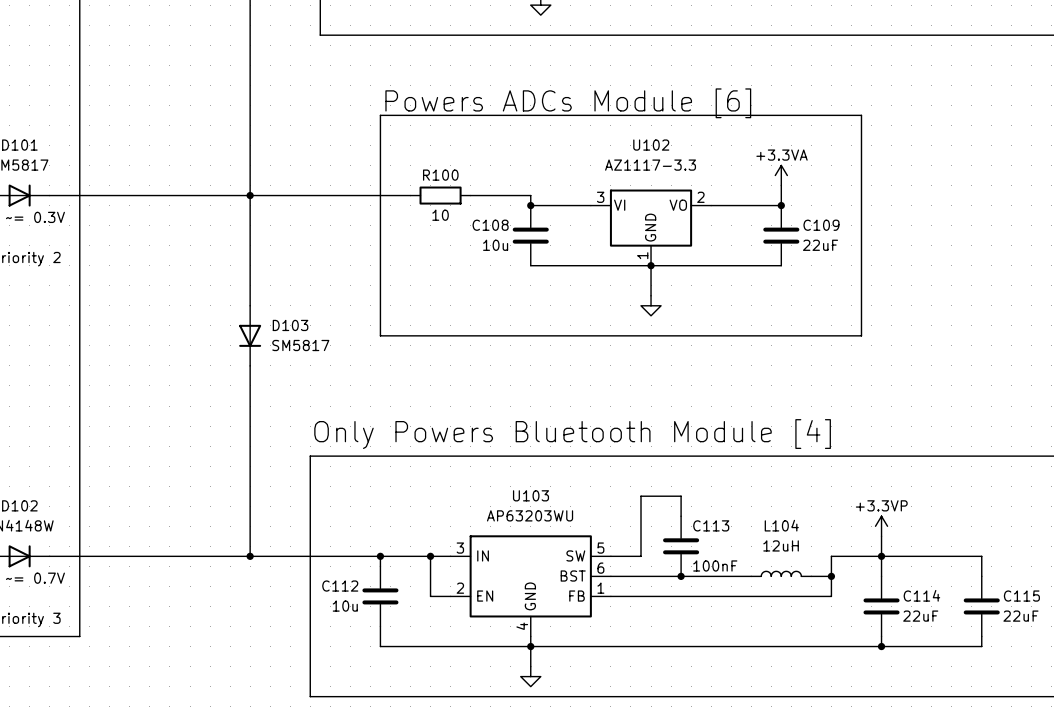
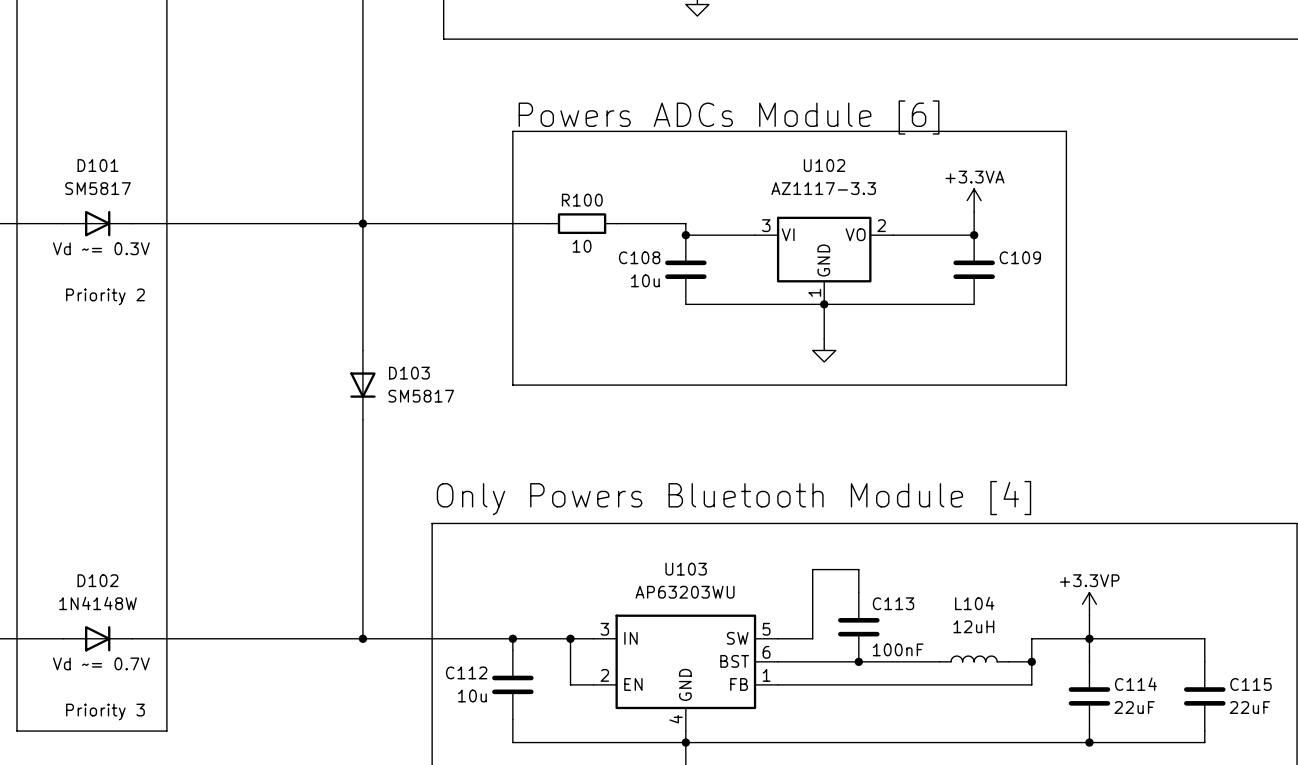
C109 value: 22uF (820, 245) -> none

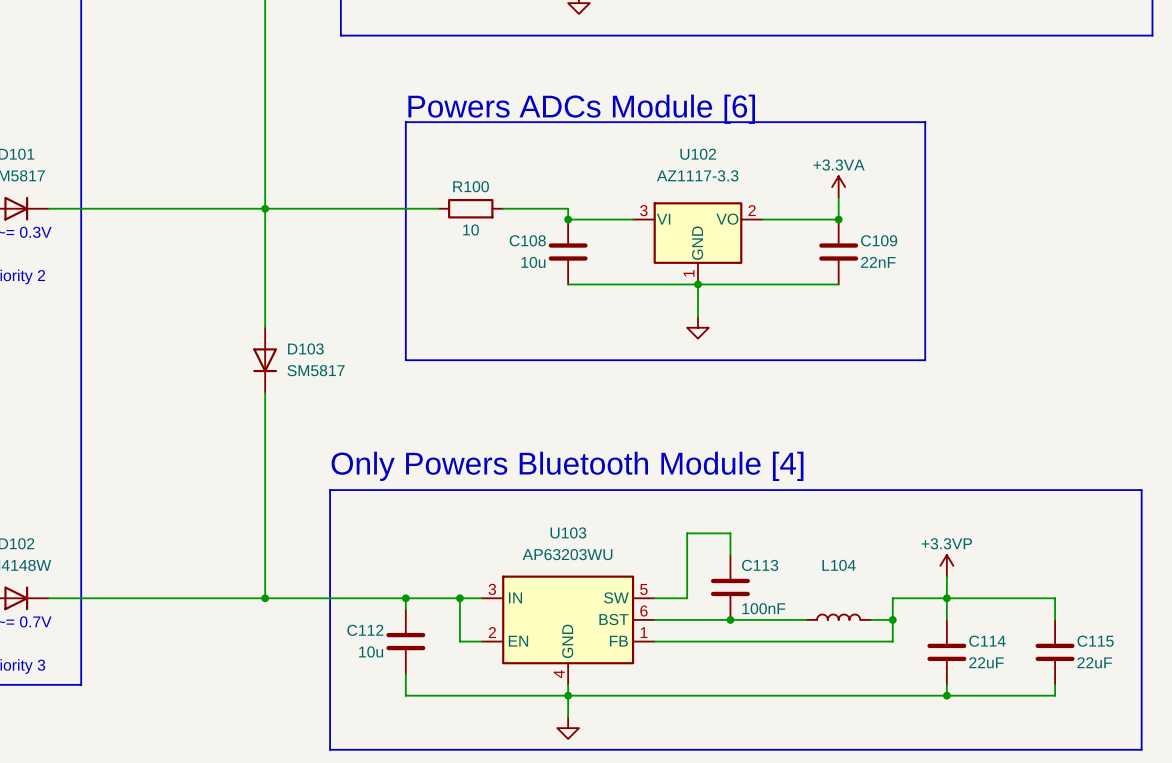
C109 value: none -> 22nF (878, 262)
L104 value: 12uH (973, 626) -> none

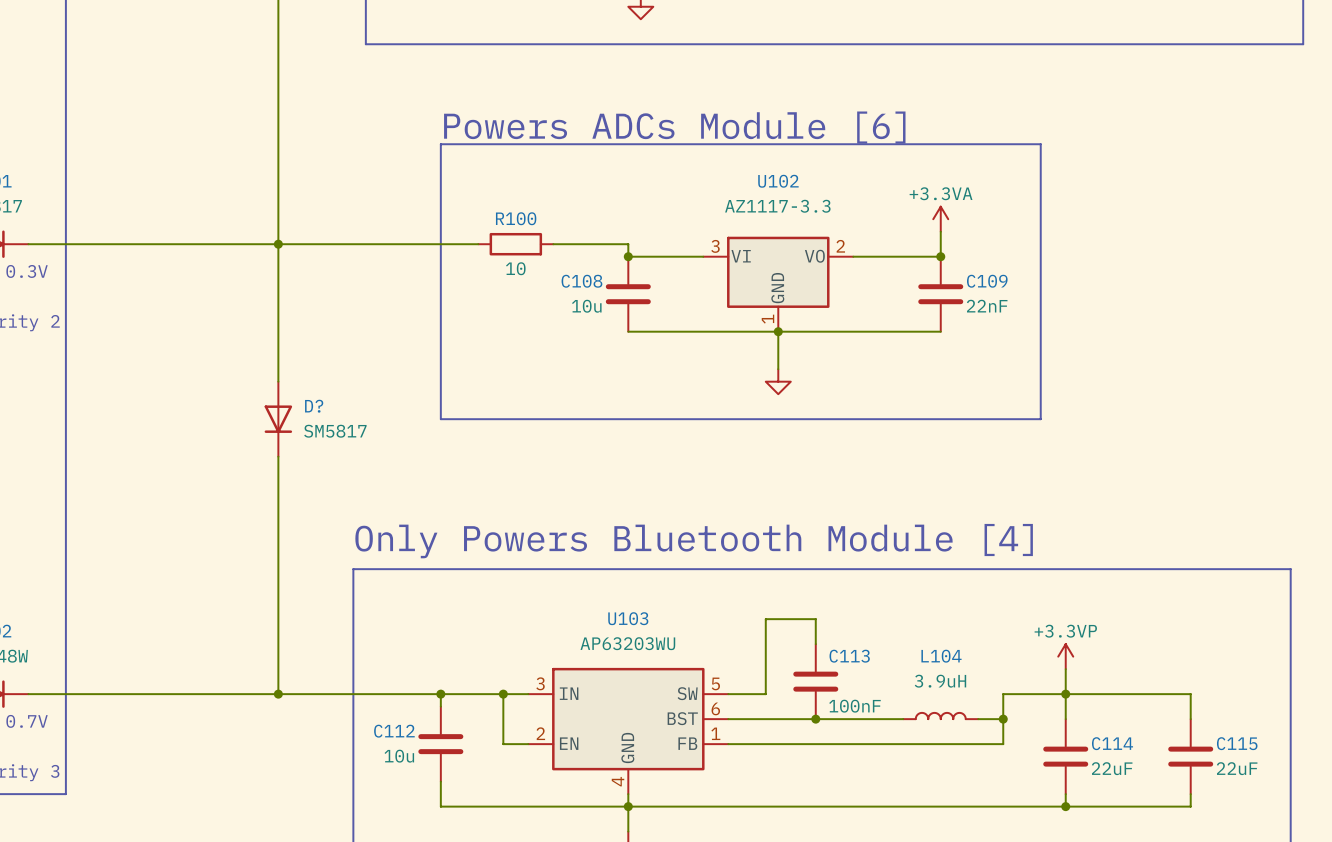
D103 name: D103 (305, 348) -> D? (314, 406)
L104 value: none -> 3.9uH (940, 681)

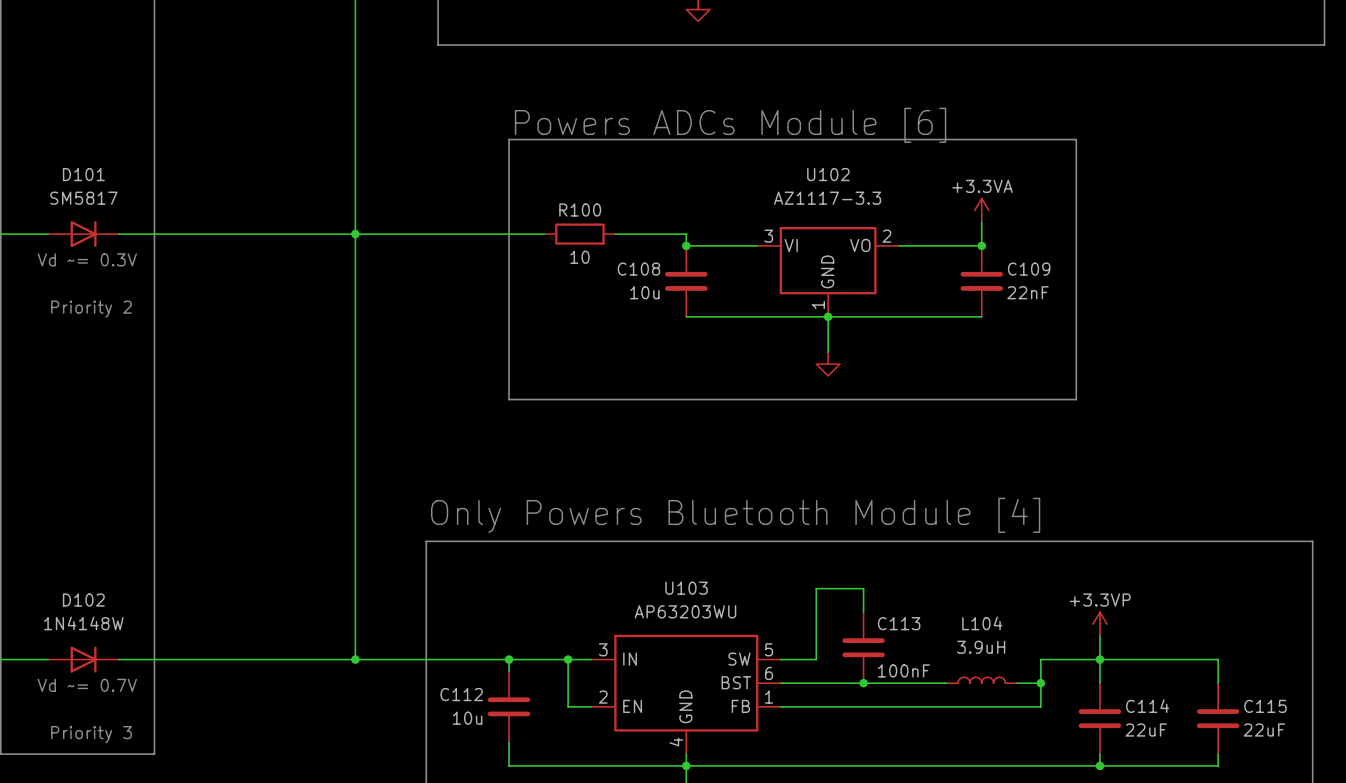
D?: SM5817 (278, 419) -> none

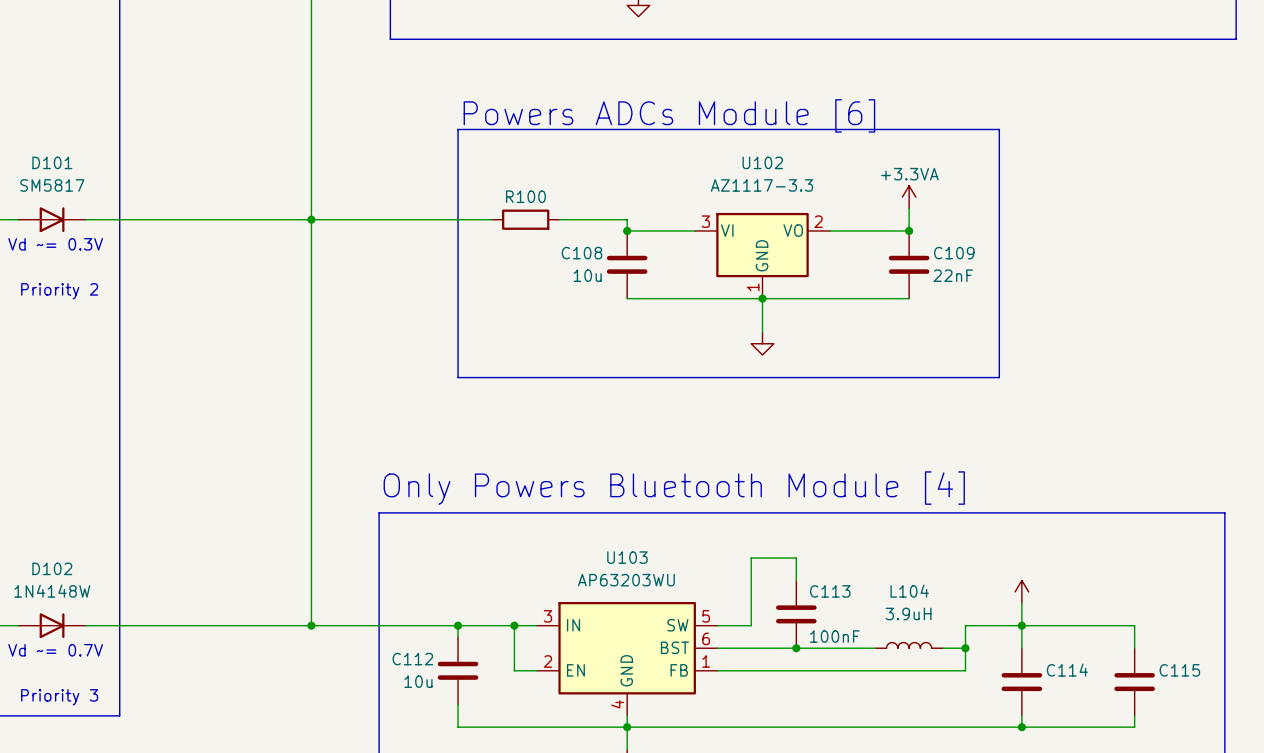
R100 value: 10 (579, 257) -> none
power symbol text: +3.3VP (1100, 600) -> none
C114 value: 22uF (1146, 730) -> none
C115 value: 22uF (1264, 730) -> none

